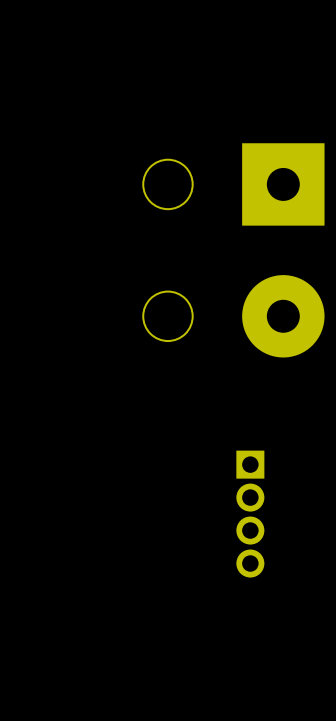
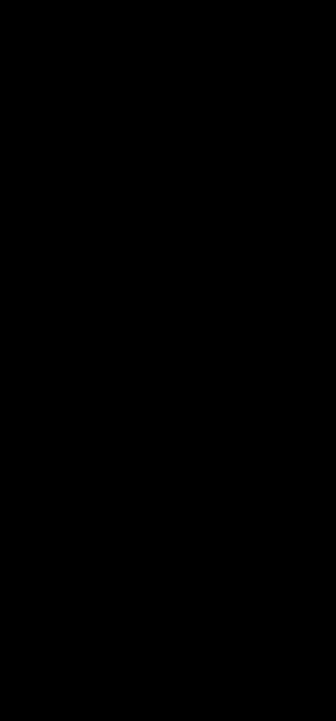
part: (233, 250) -> none
part: (250, 514) -> none

